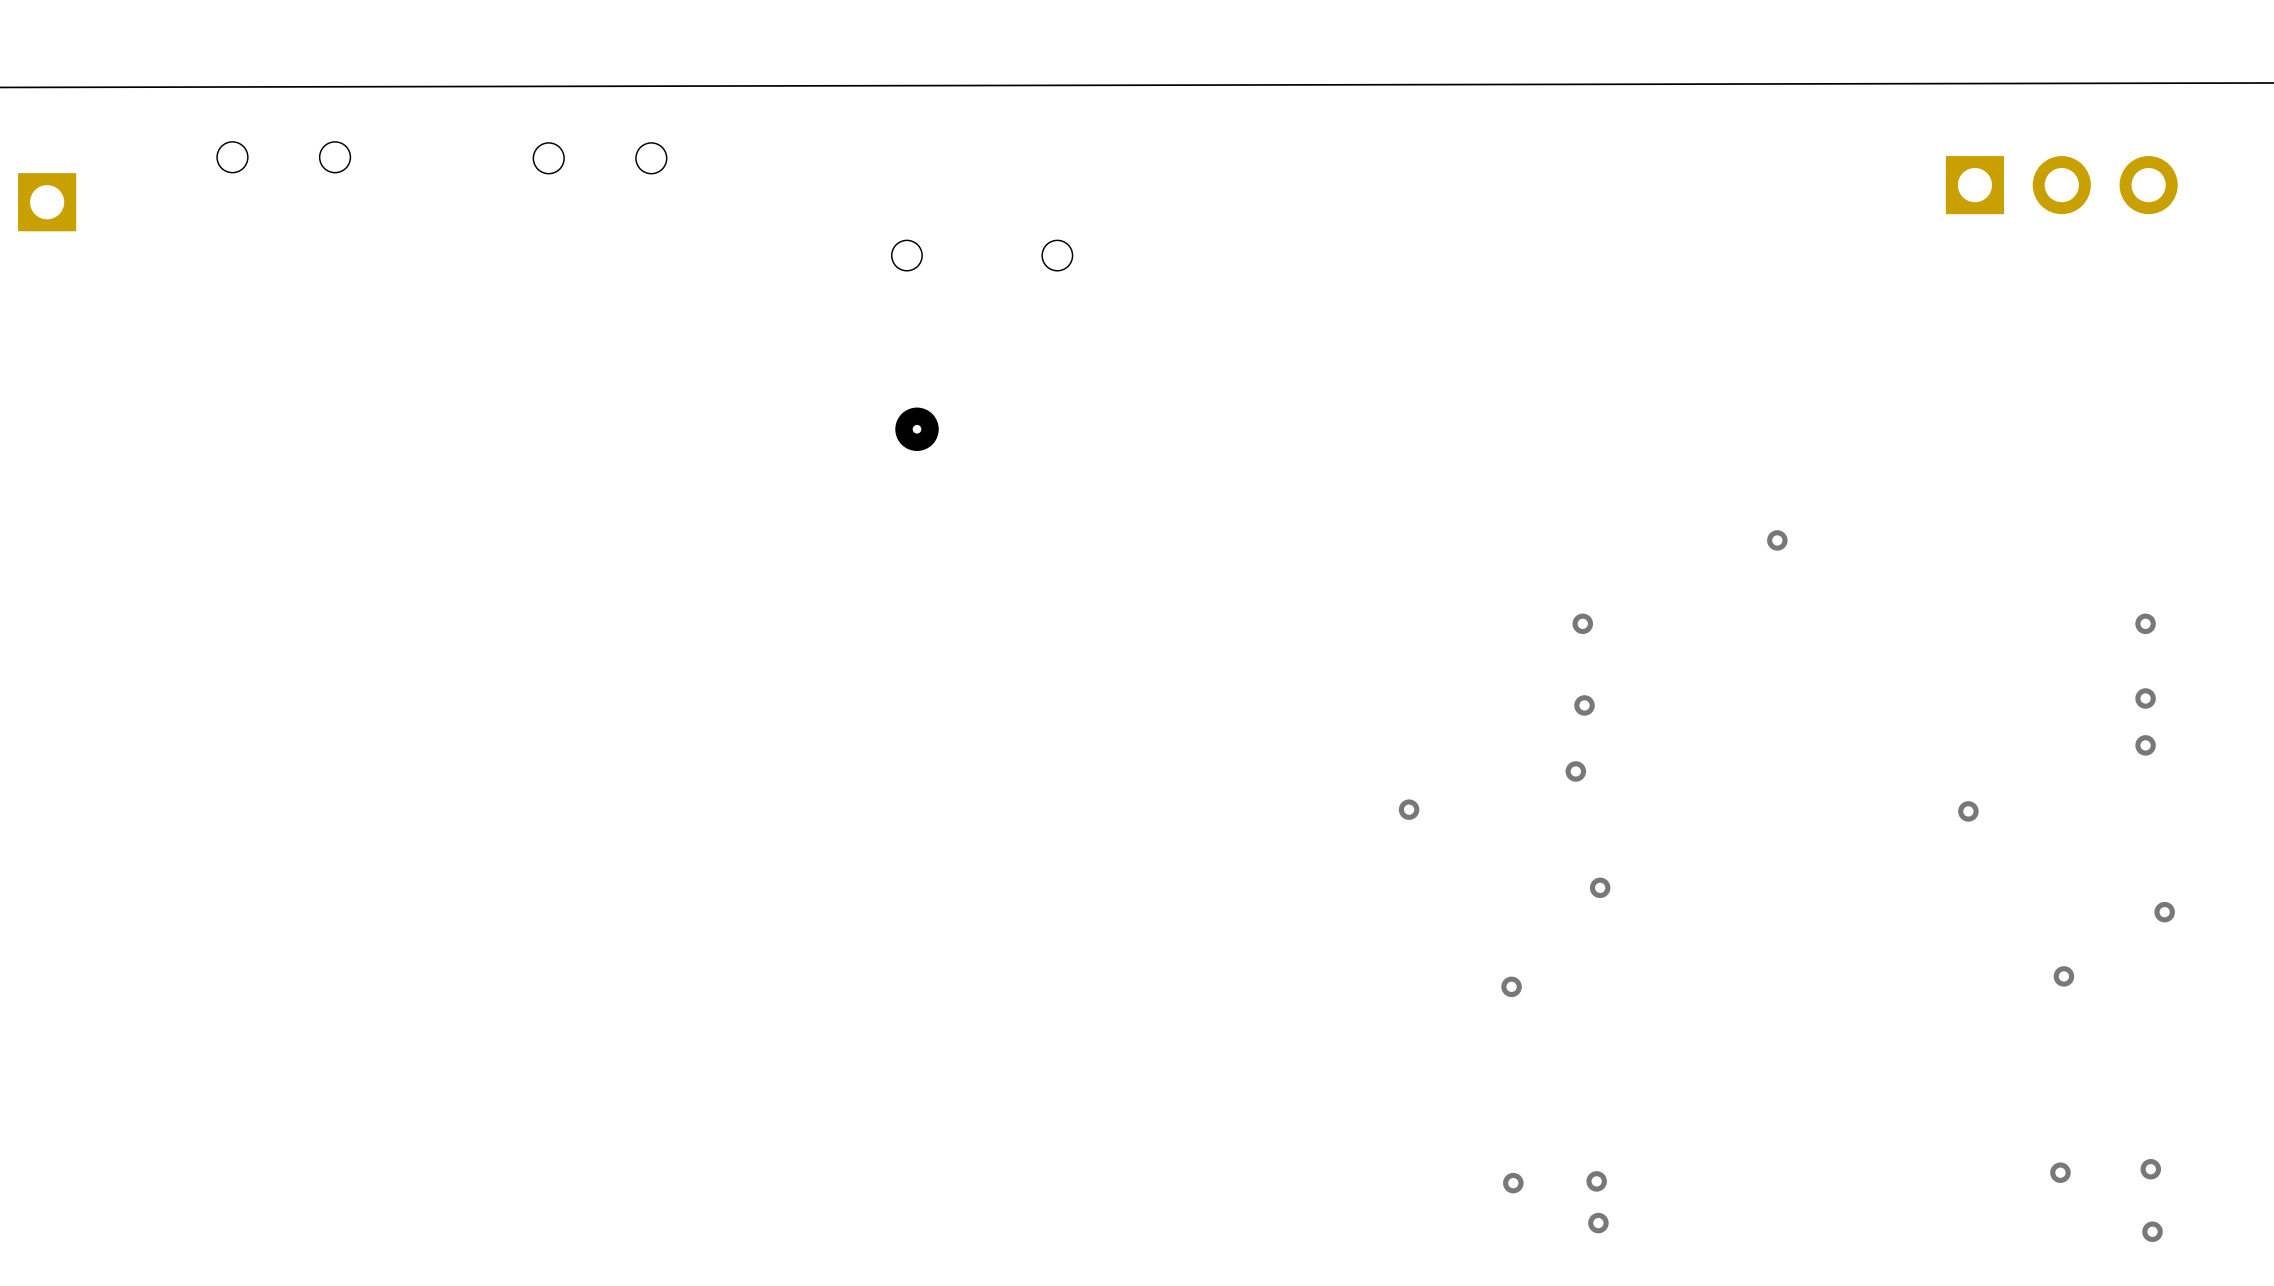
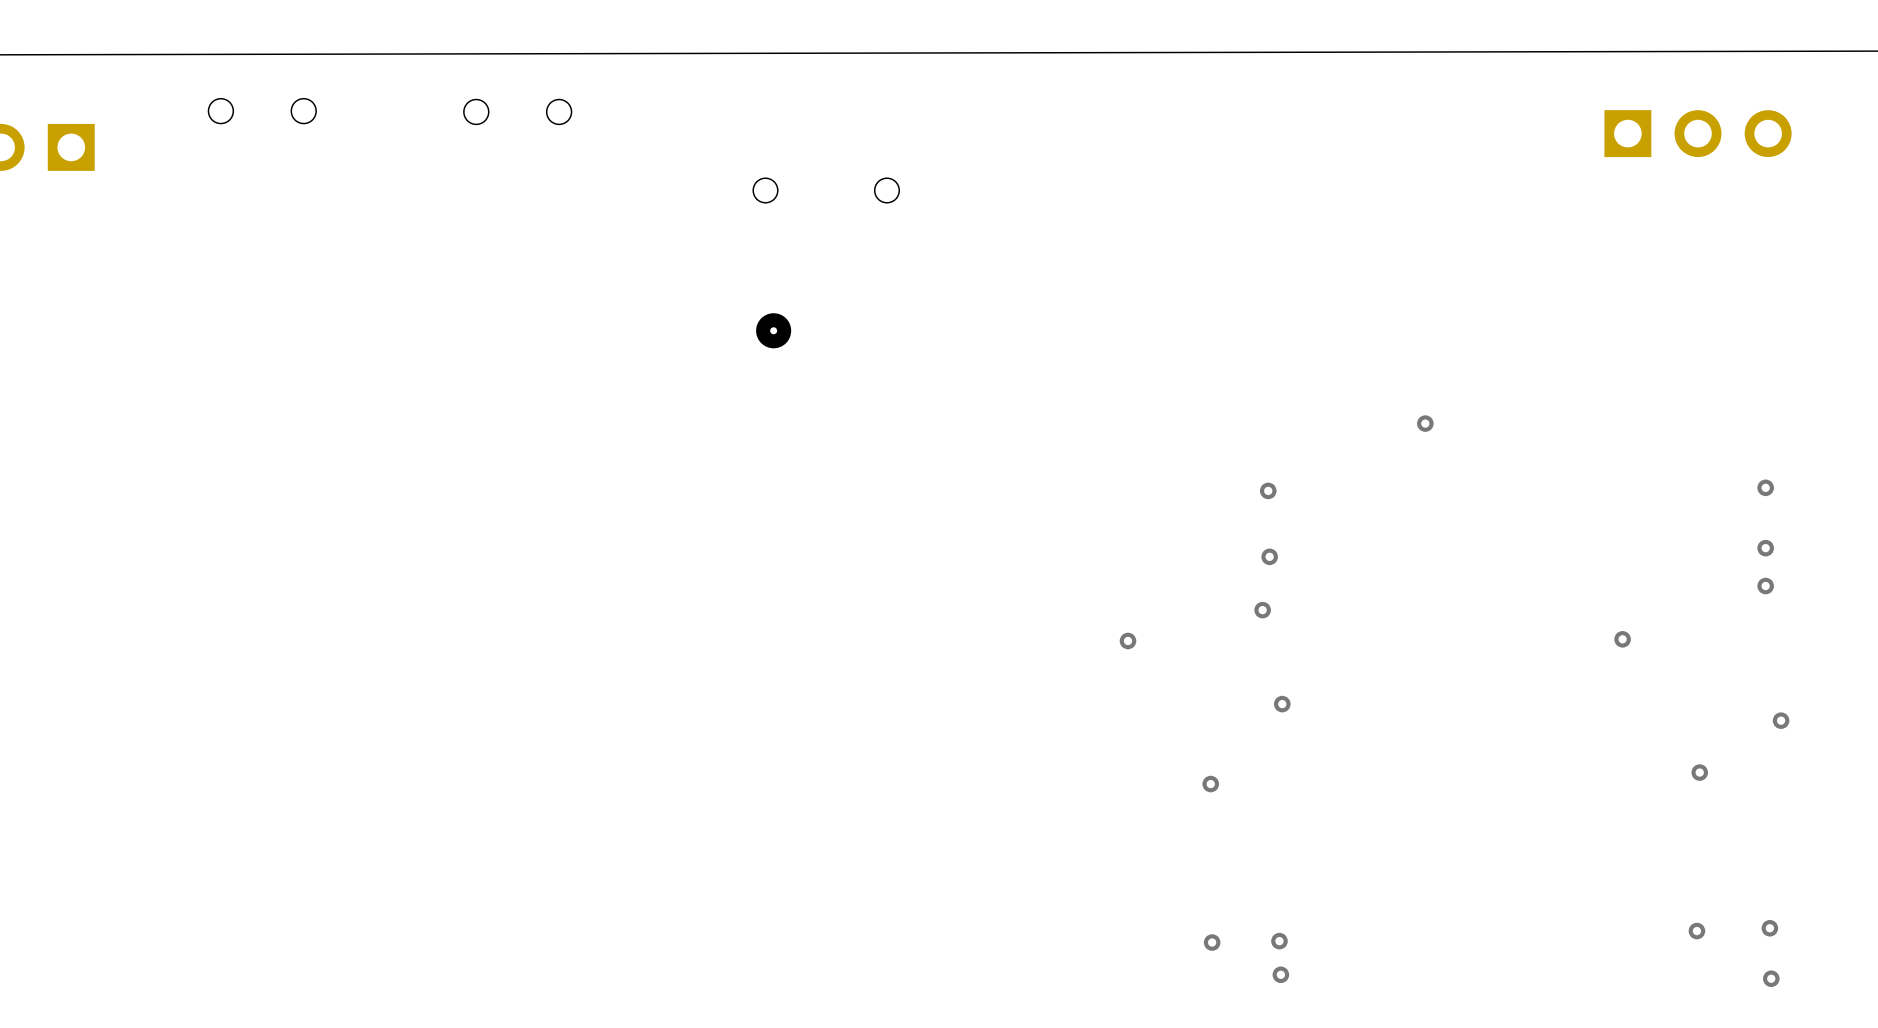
via position: (1777, 540) -> (1425, 423)
via: (1582, 623) -> none
via: none -> (1268, 490)
via: (1584, 705) -> none
via: none -> (1269, 556)
via: (1575, 771) -> none
via: none -> (1262, 610)
via position: (1409, 809) -> (1127, 640)
via: (1600, 887) -> none
via: none -> (1282, 704)
via: (1511, 986) -> none
via: none -> (1210, 784)
via: (1596, 1181) -> none
via: (1513, 1183) -> none
via: none -> (1279, 941)
via: none -> (1212, 942)
via: (1598, 1223) -> none
via: none -> (1280, 974)

